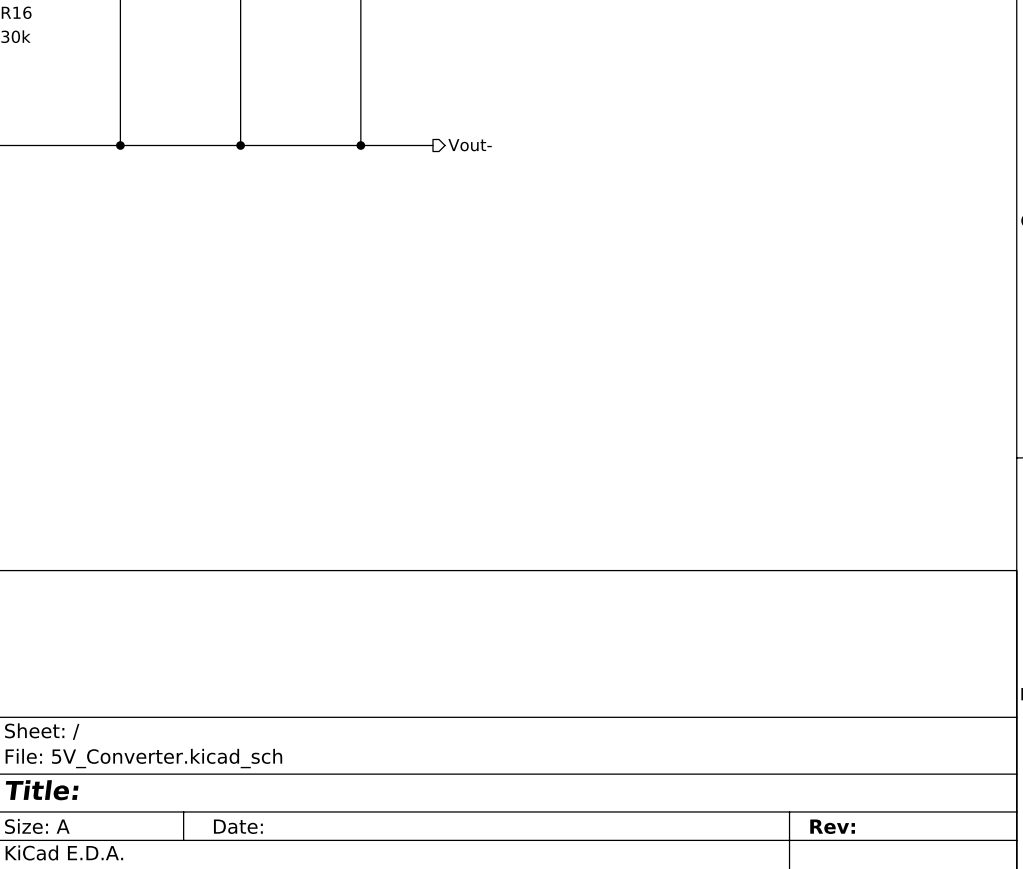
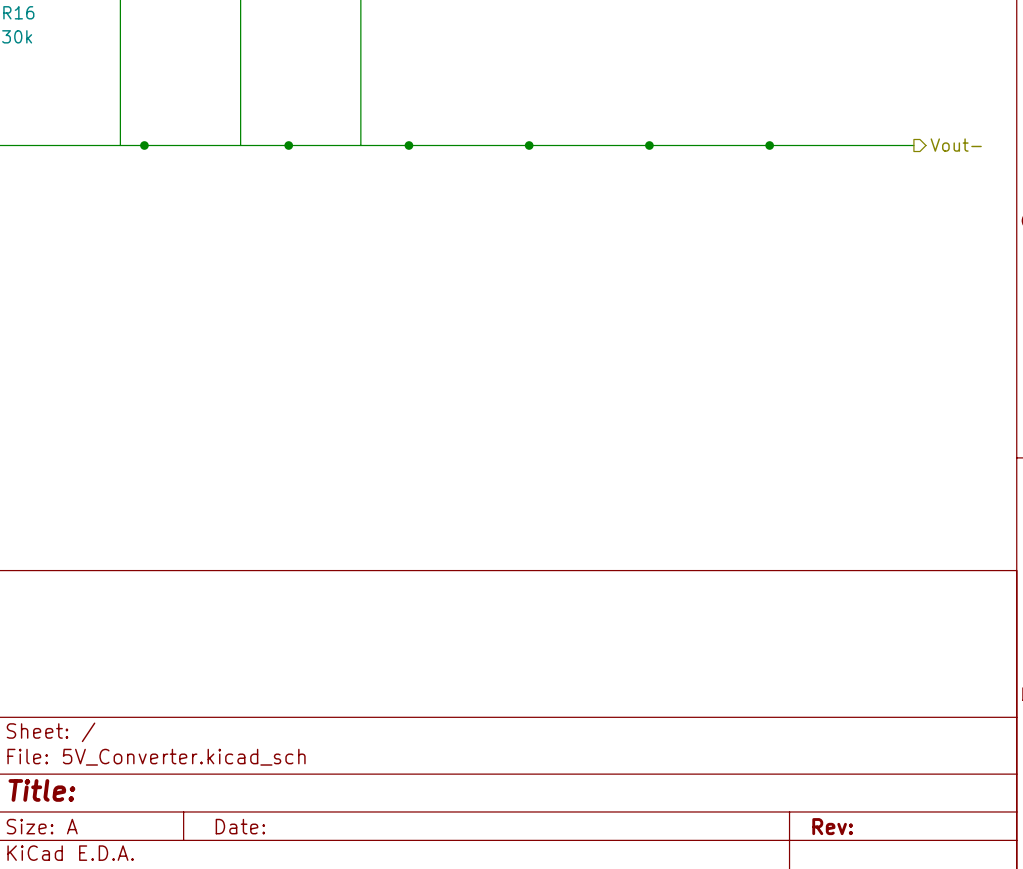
junction position: (120, 145) -> (144, 145)
junction: (240, 145) -> none
junction: none -> (288, 145)
junction: (360, 145) -> none
junction: none -> (408, 145)
wire: none -> (433, 145) (913, 145)
hierarchical label: Vout- (470, 145) -> none
junction: none -> (529, 145)
junction: none -> (649, 145)
junction: none -> (769, 145)
hierarchical label: none -> Vout- (956, 145)

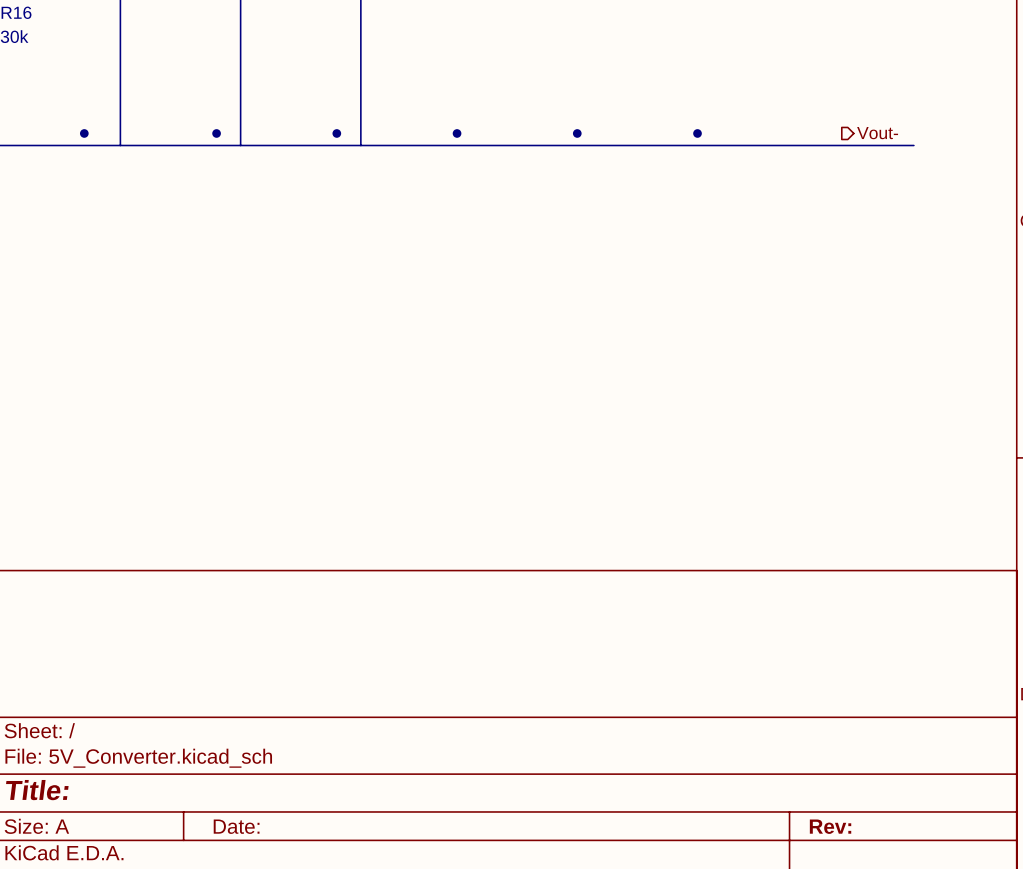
junction: none -> (84, 133)
junction: none -> (216, 133)
junction: none -> (336, 133)
junction: none -> (457, 133)
junction: none -> (577, 133)
junction: none -> (697, 133)
junction: (144, 145) -> none
junction: (288, 145) -> none
junction: (408, 145) -> none
junction: (529, 145) -> none
junction: (649, 145) -> none
junction: (769, 145) -> none
hierarchical label position: Vout- (956, 145) -> Vout- (877, 133)

